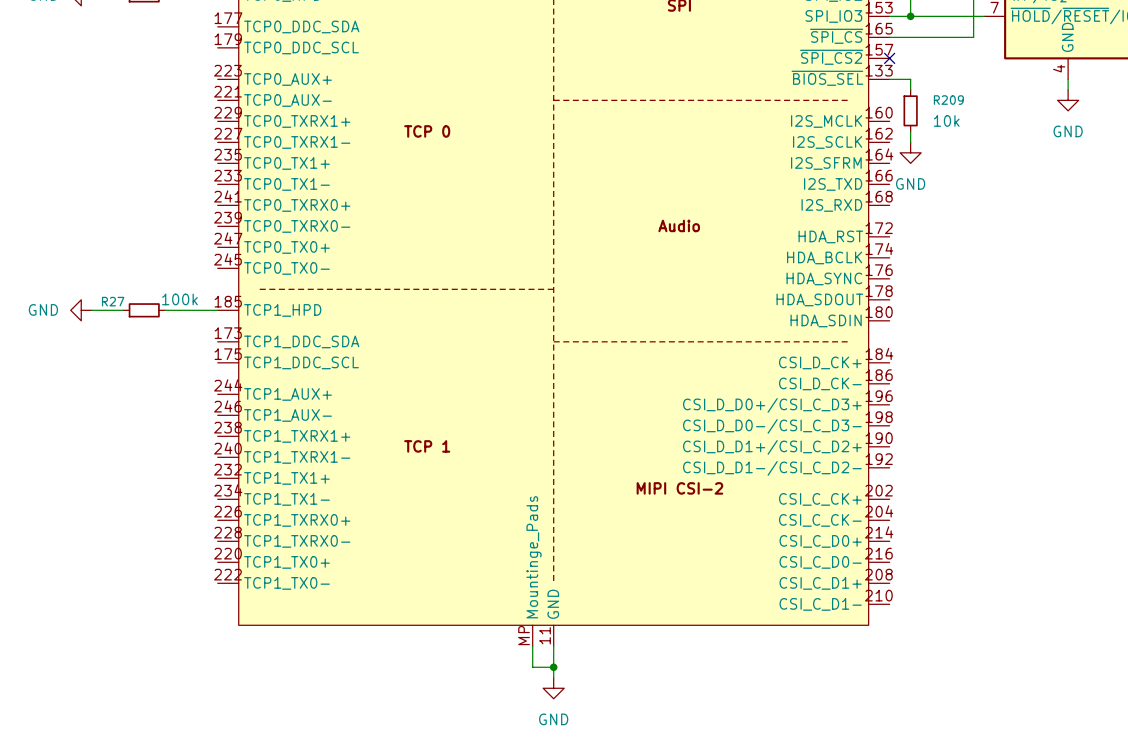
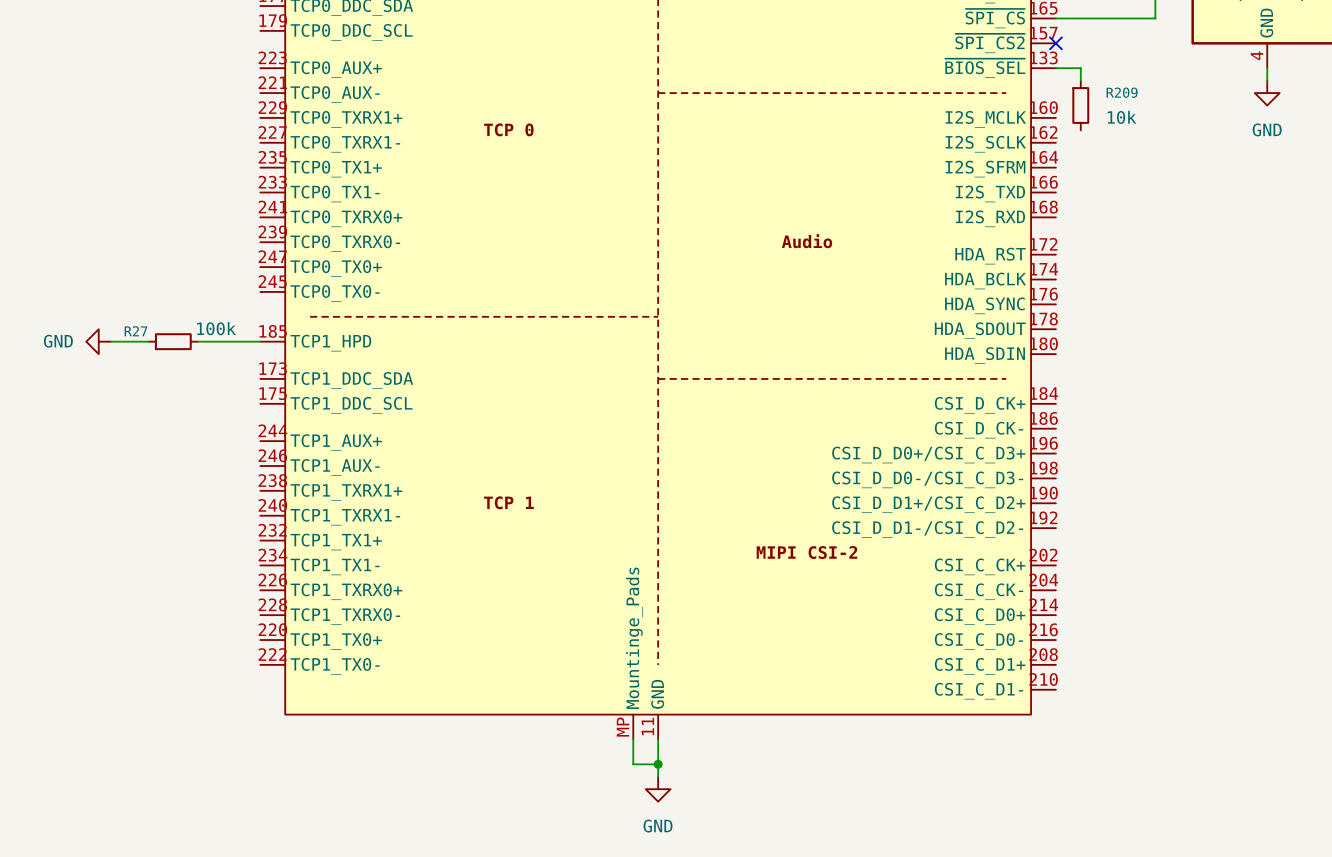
wire: (910, 131) (910, 142) -> none
power symbol: GND (910, 152) -> none

